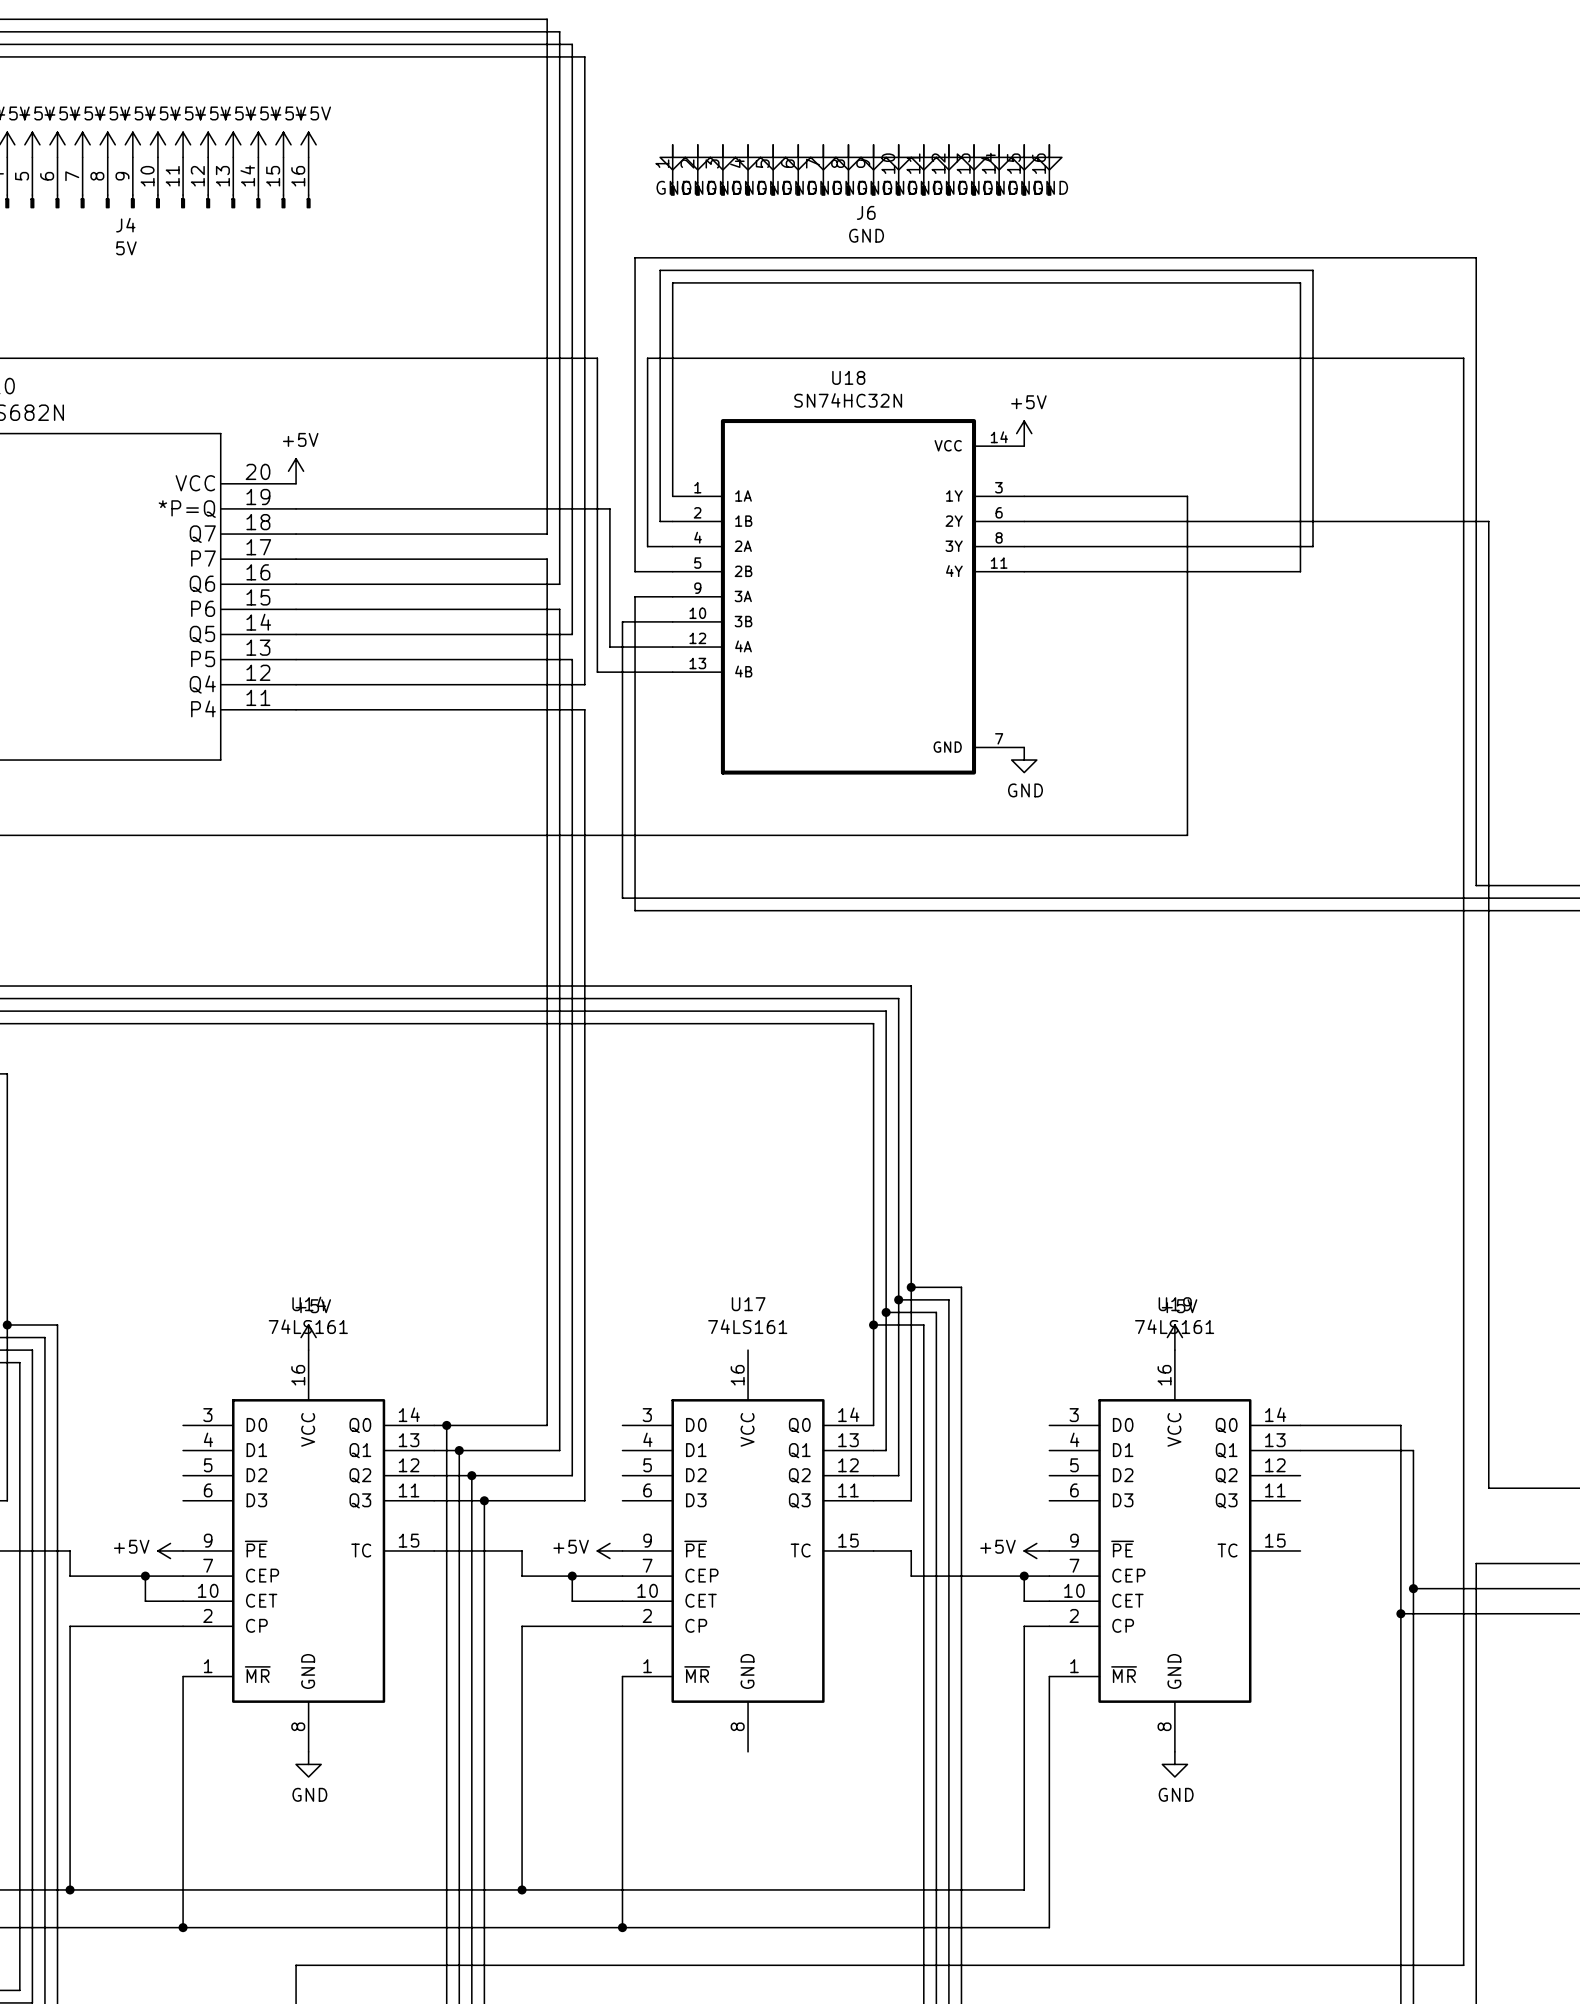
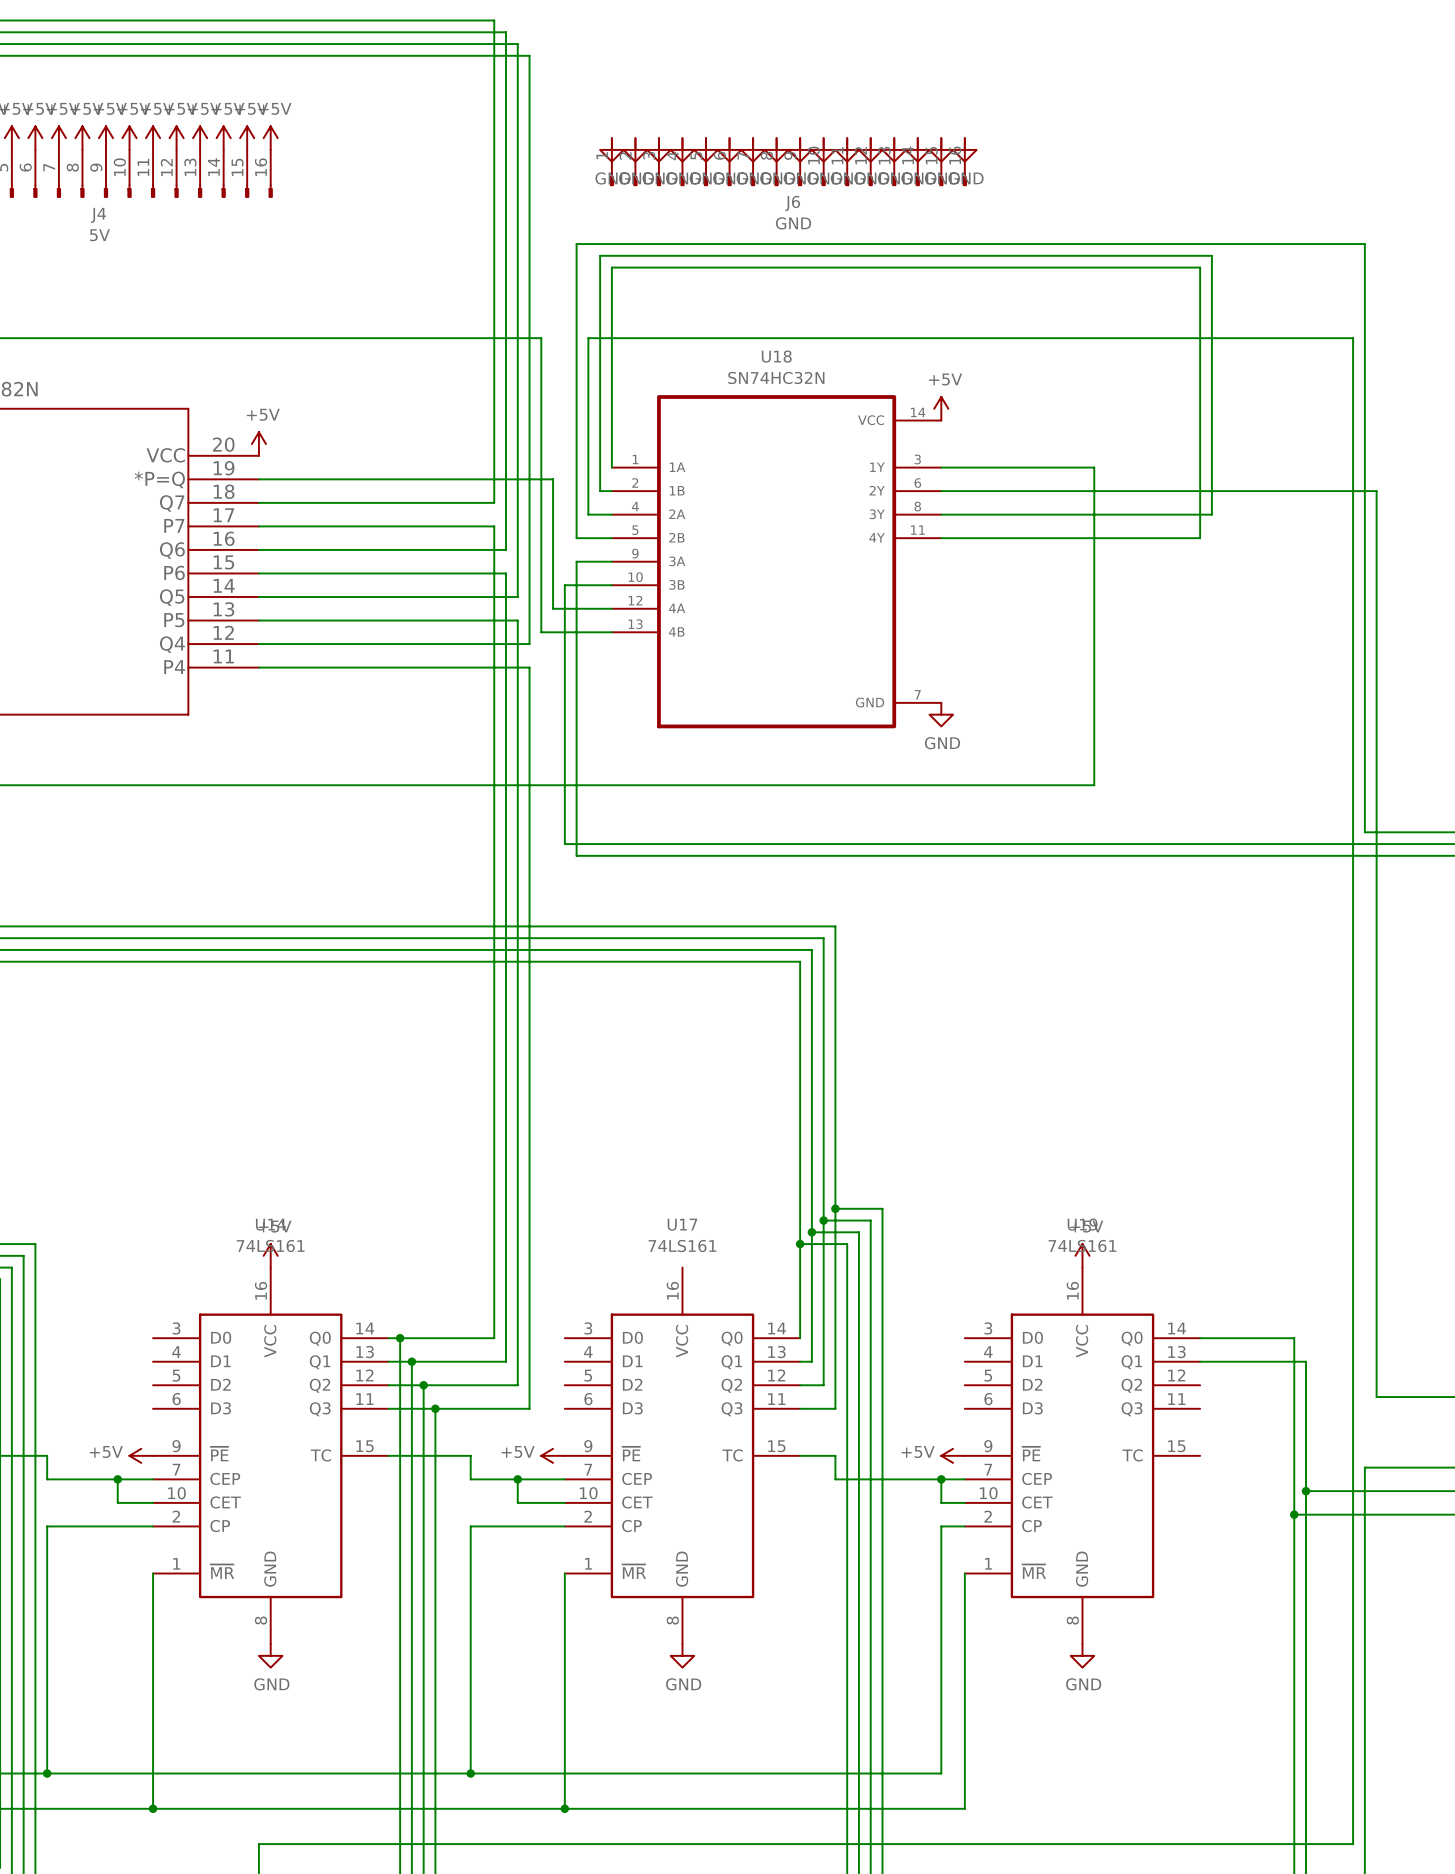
power symbol: none -> GND (682, 1655)

